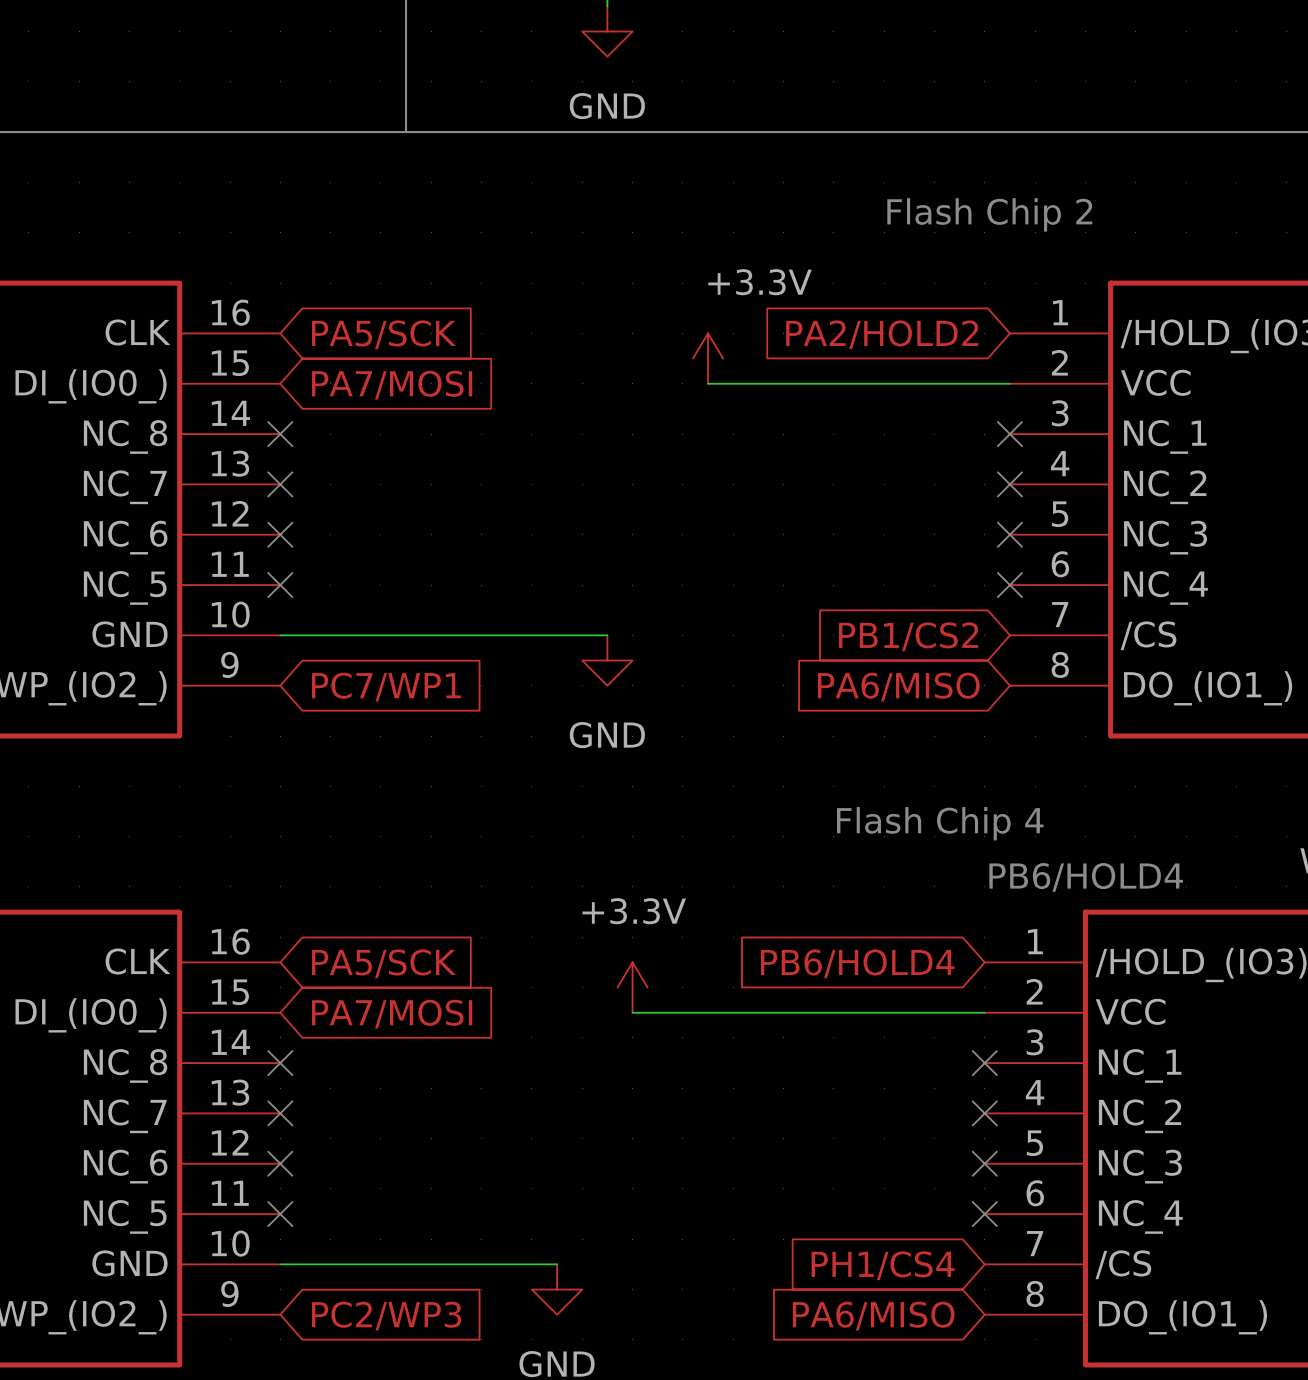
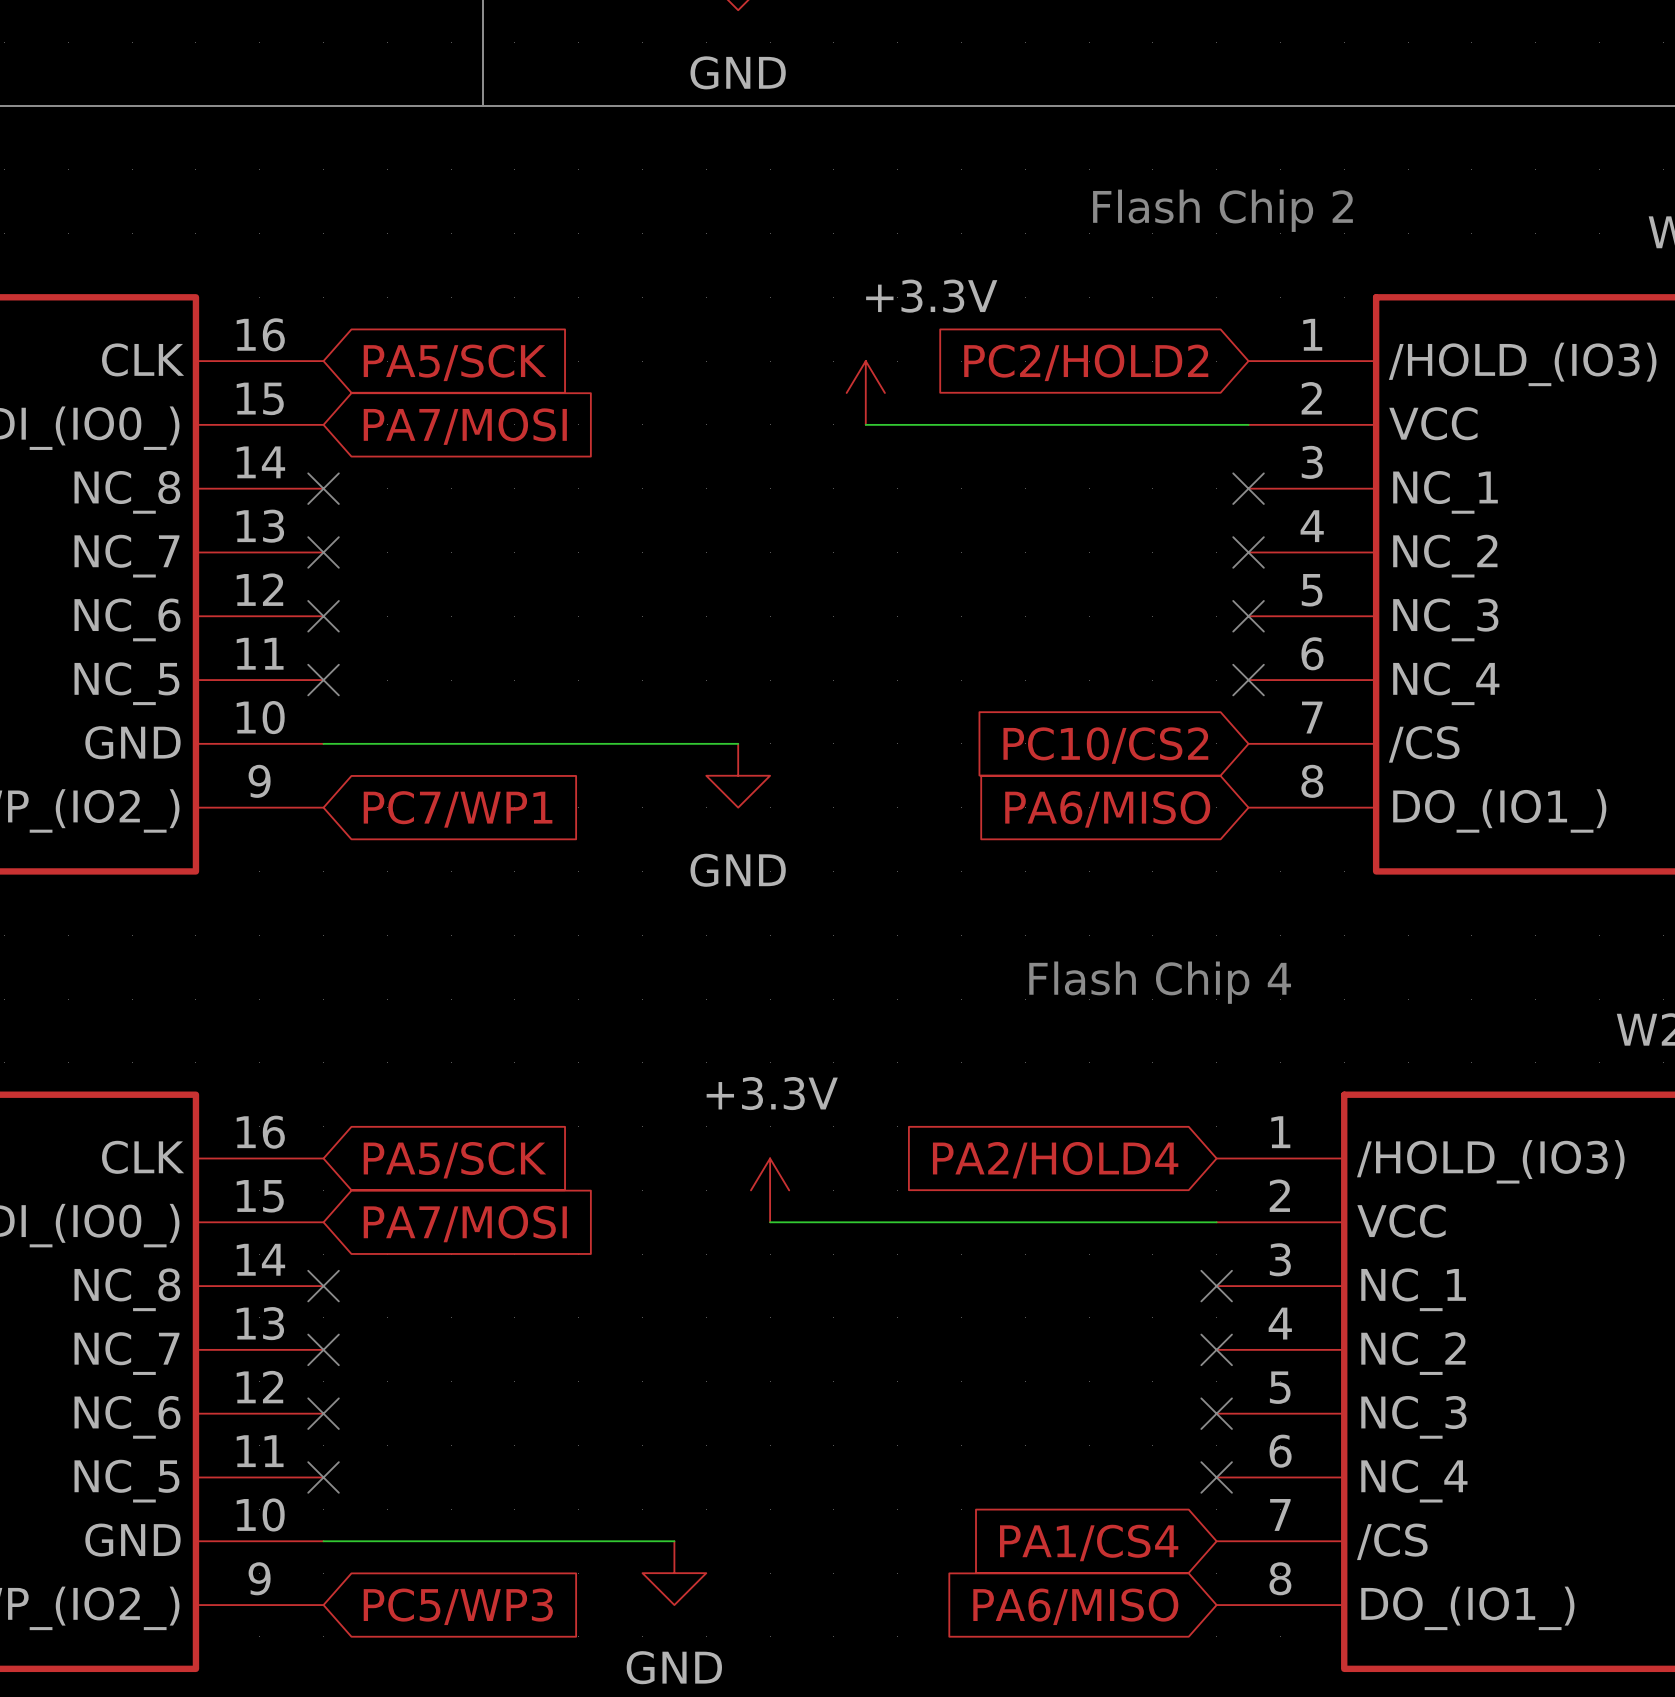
global label: PA2/HOLD2 (882, 334) -> PC2/HOLD2 (1086, 362)
global label: PB1/CS2 (908, 636) -> PC10/CS2 (1105, 745)
text: PB6/HOLD4 (1086, 877) -> none
global label: PB6/HOLD4 (857, 963) -> PA2/HOLD4 (1055, 1160)
global label: PH1/CS4 (883, 1265) -> PA1/CS4 (1089, 1543)
global label: PC2/WP3 (386, 1316) -> PC5/WP3 (458, 1606)

